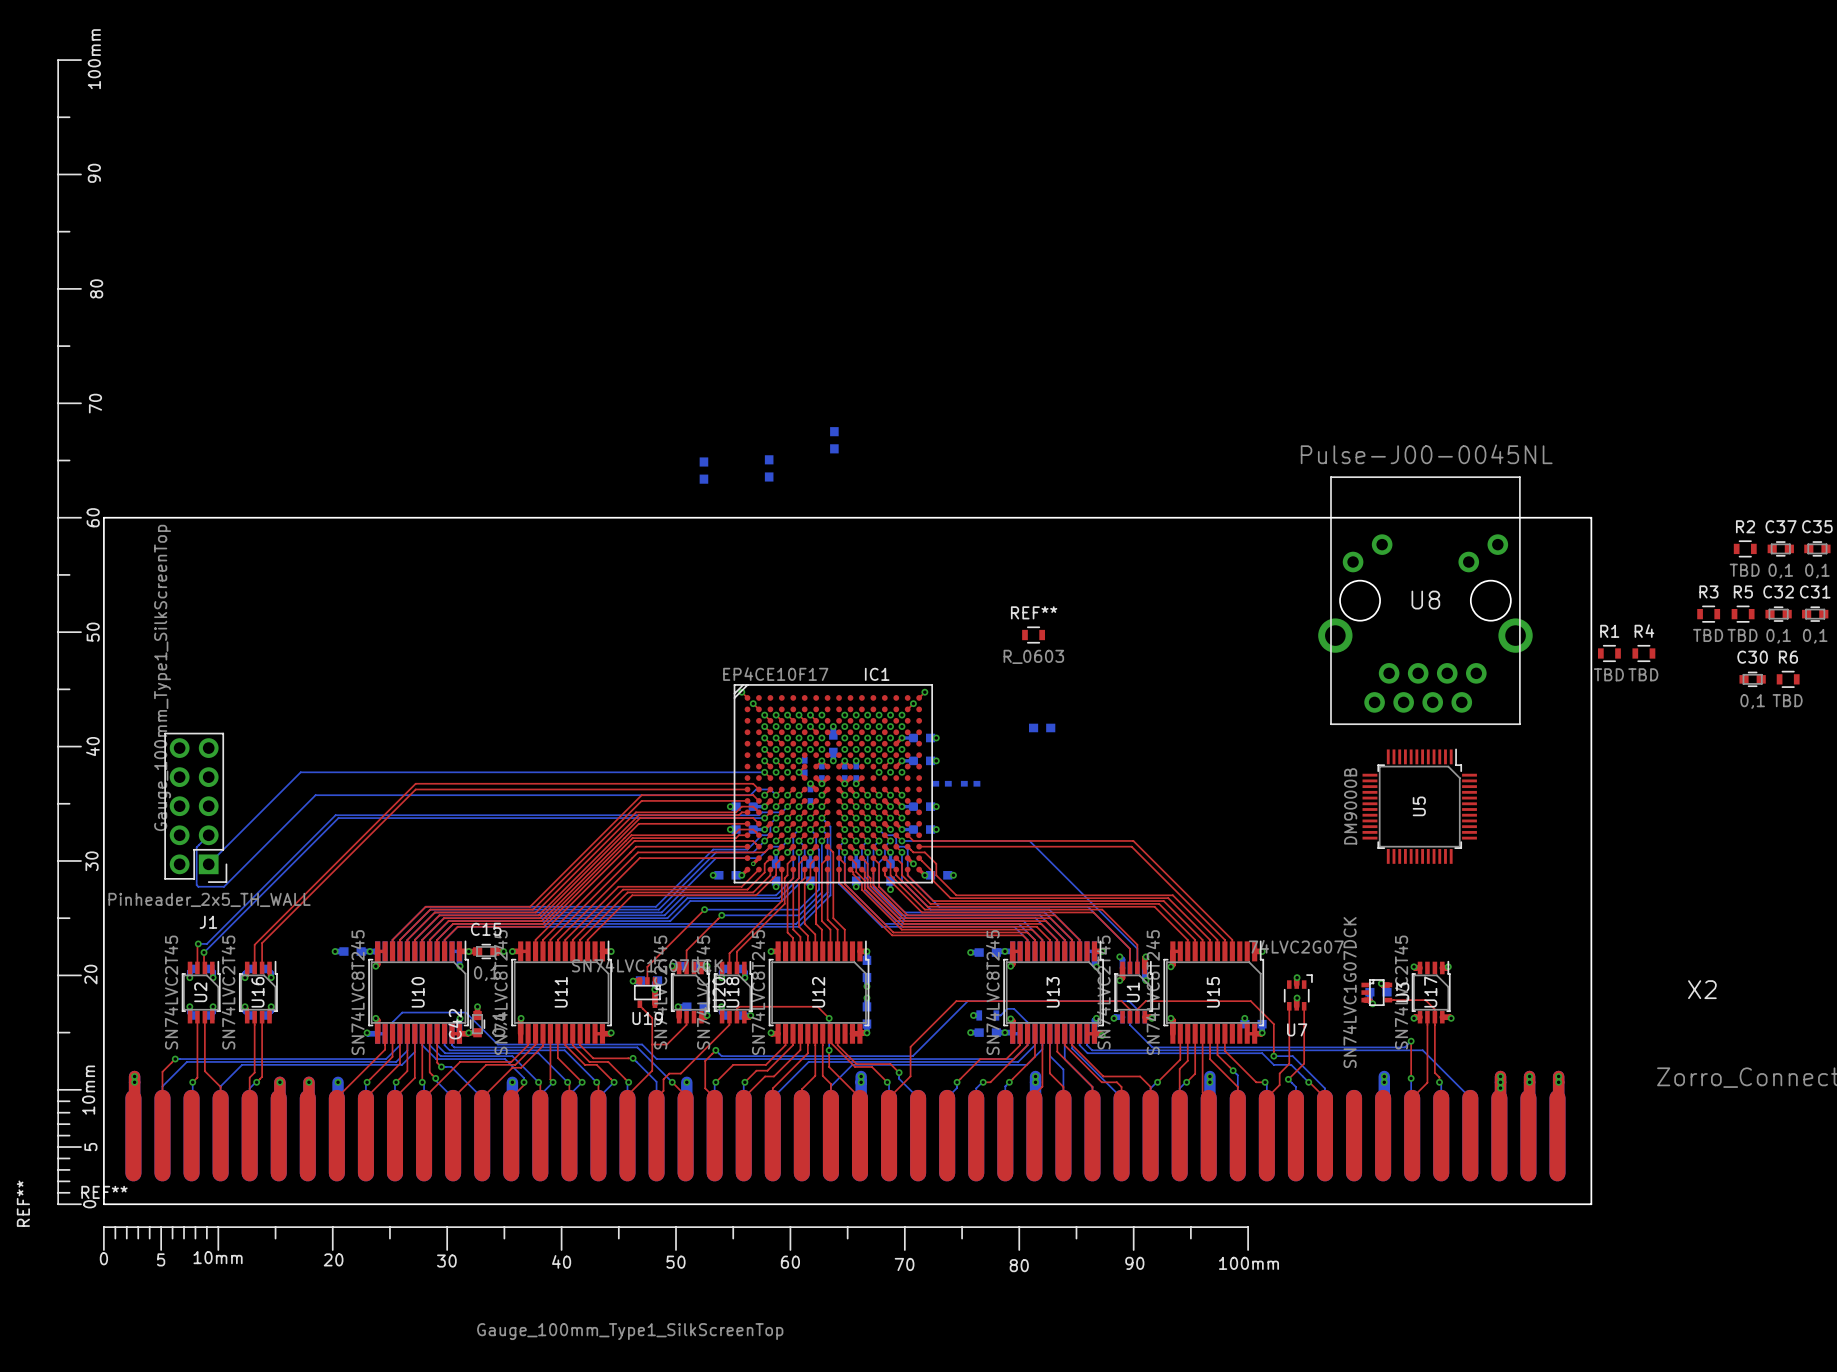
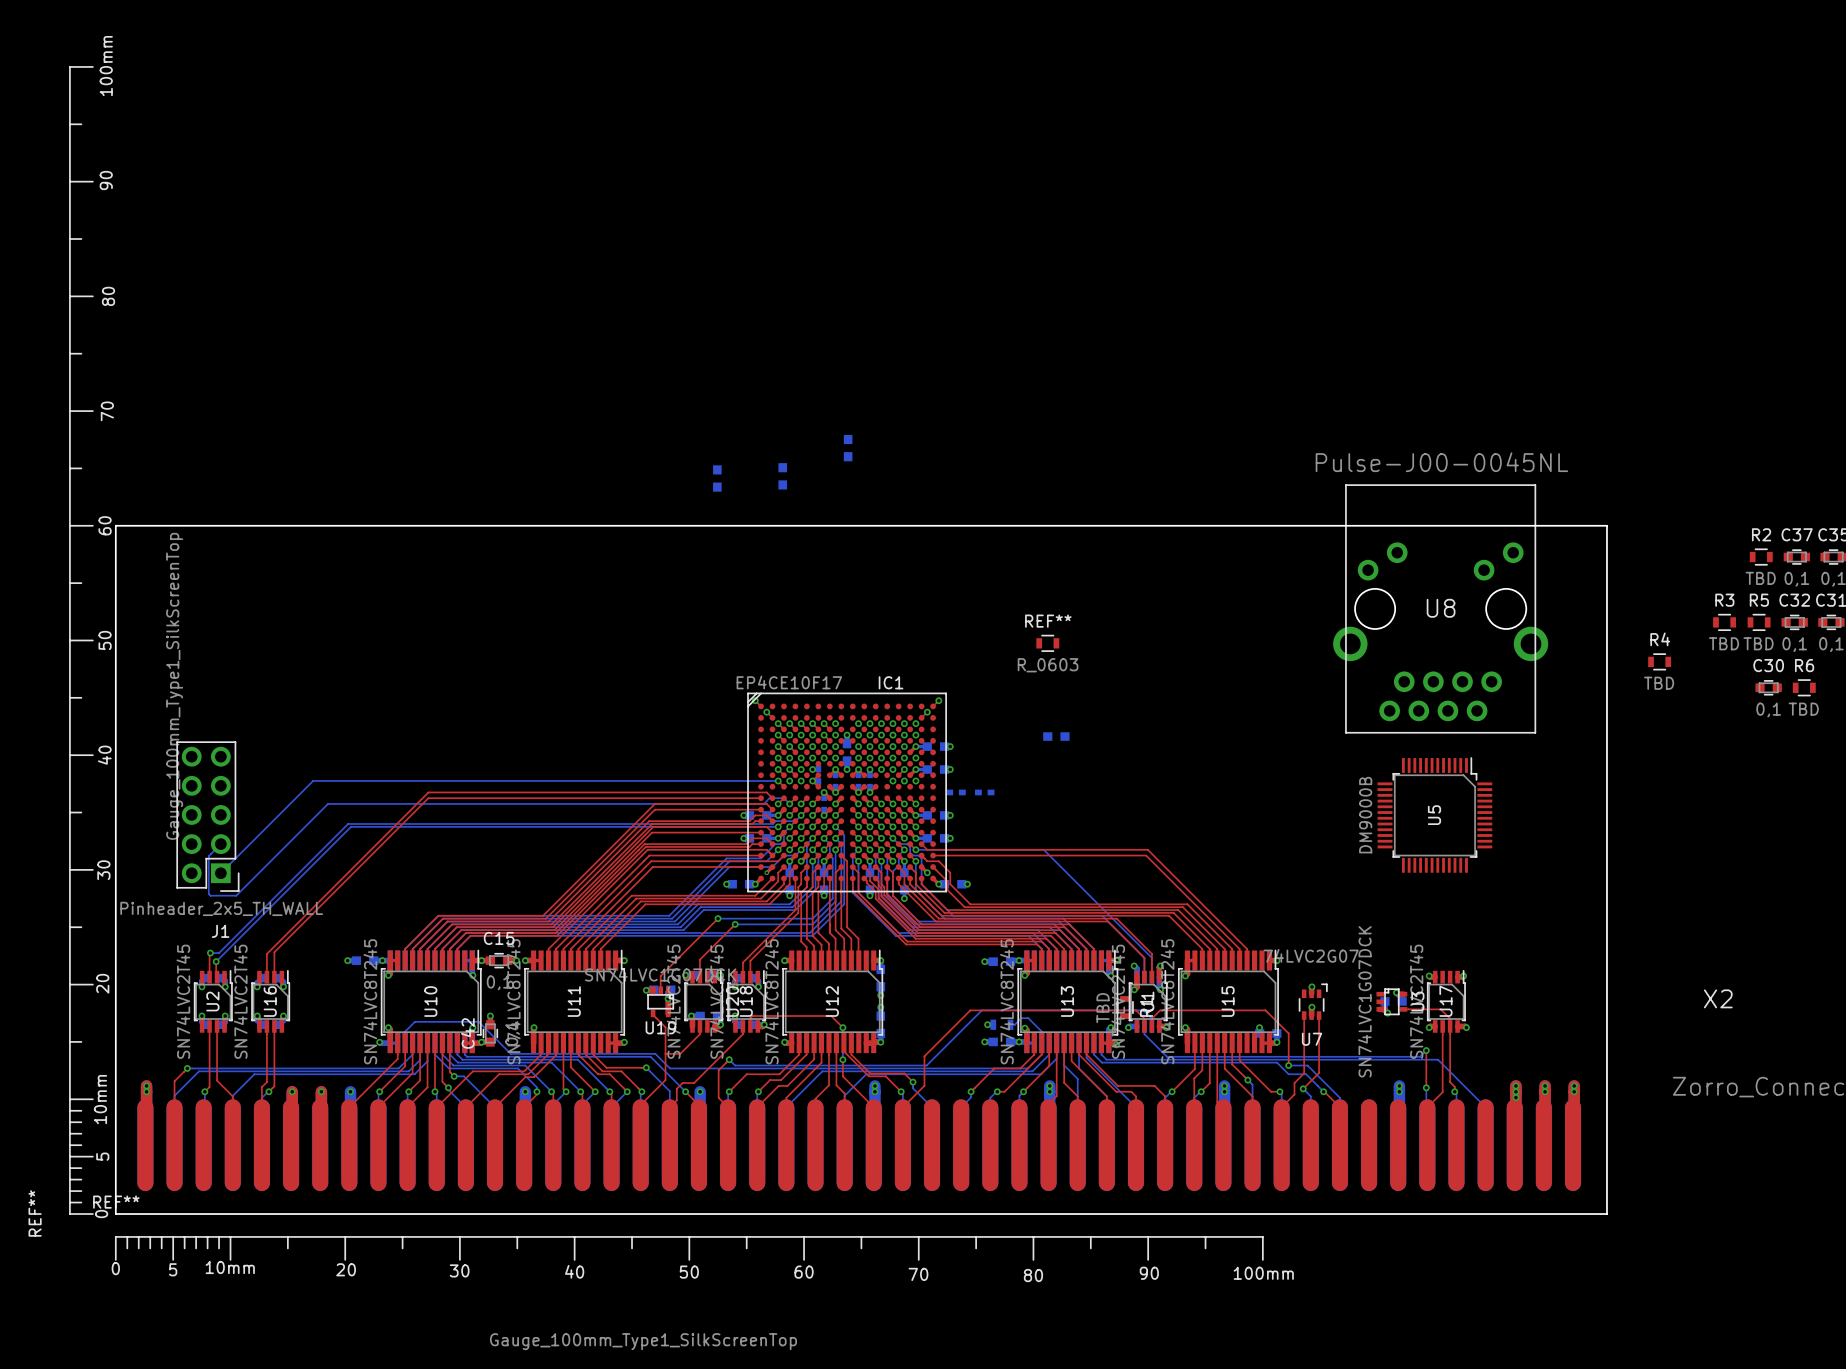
R1 rotation: 0° (1609, 653) -> 90° clockwise (1125, 1007)
R1 position: (1609, 653) -> (1125, 1007)

